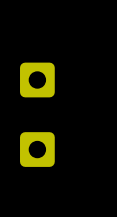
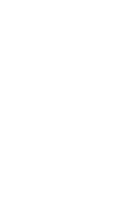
part: (37, 114) -> none

